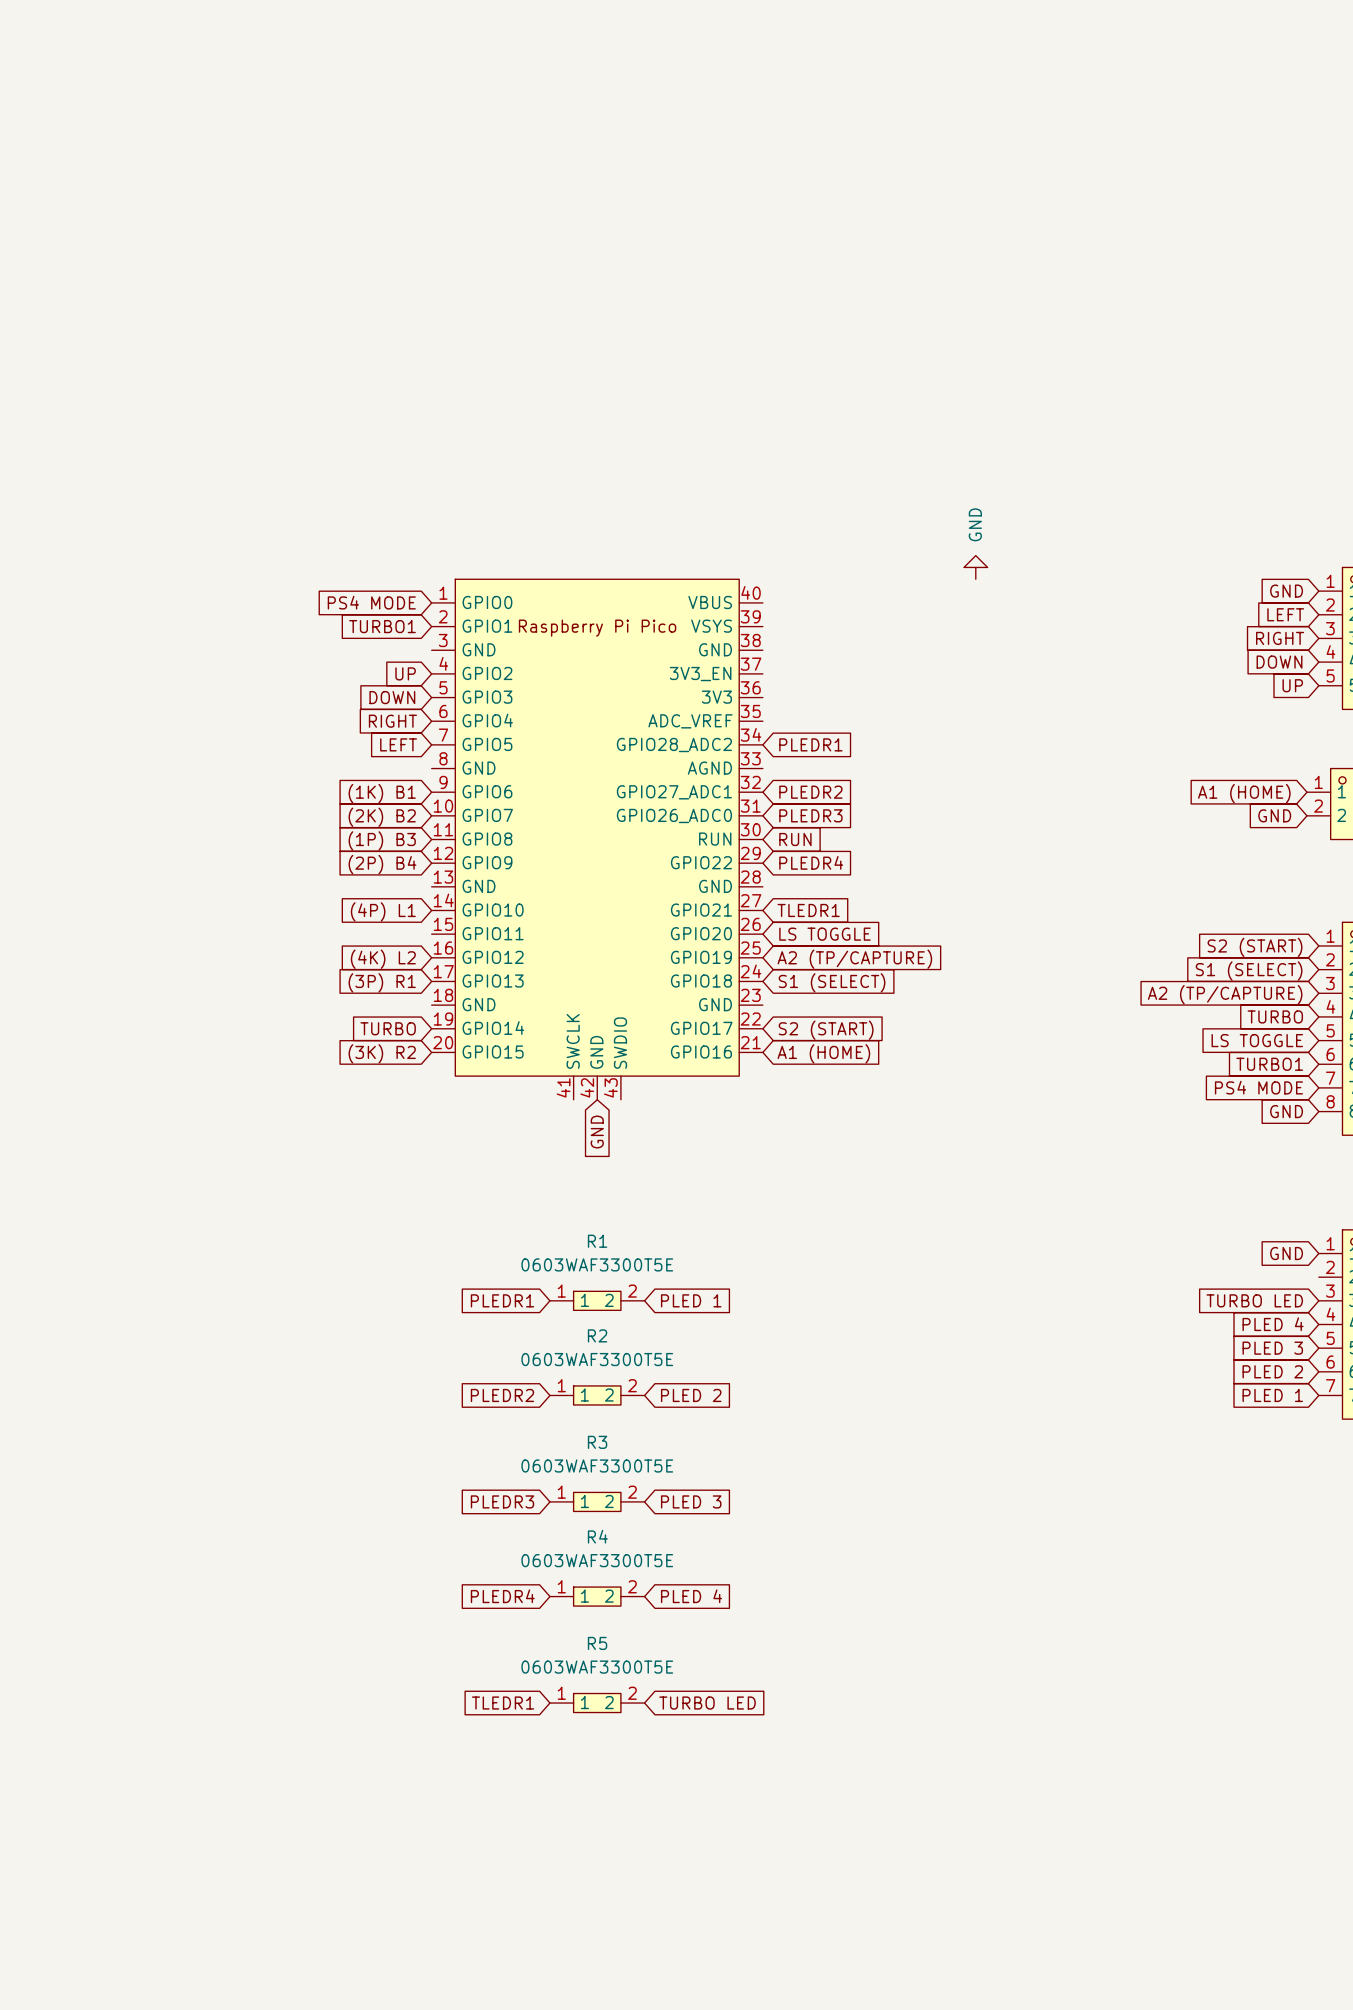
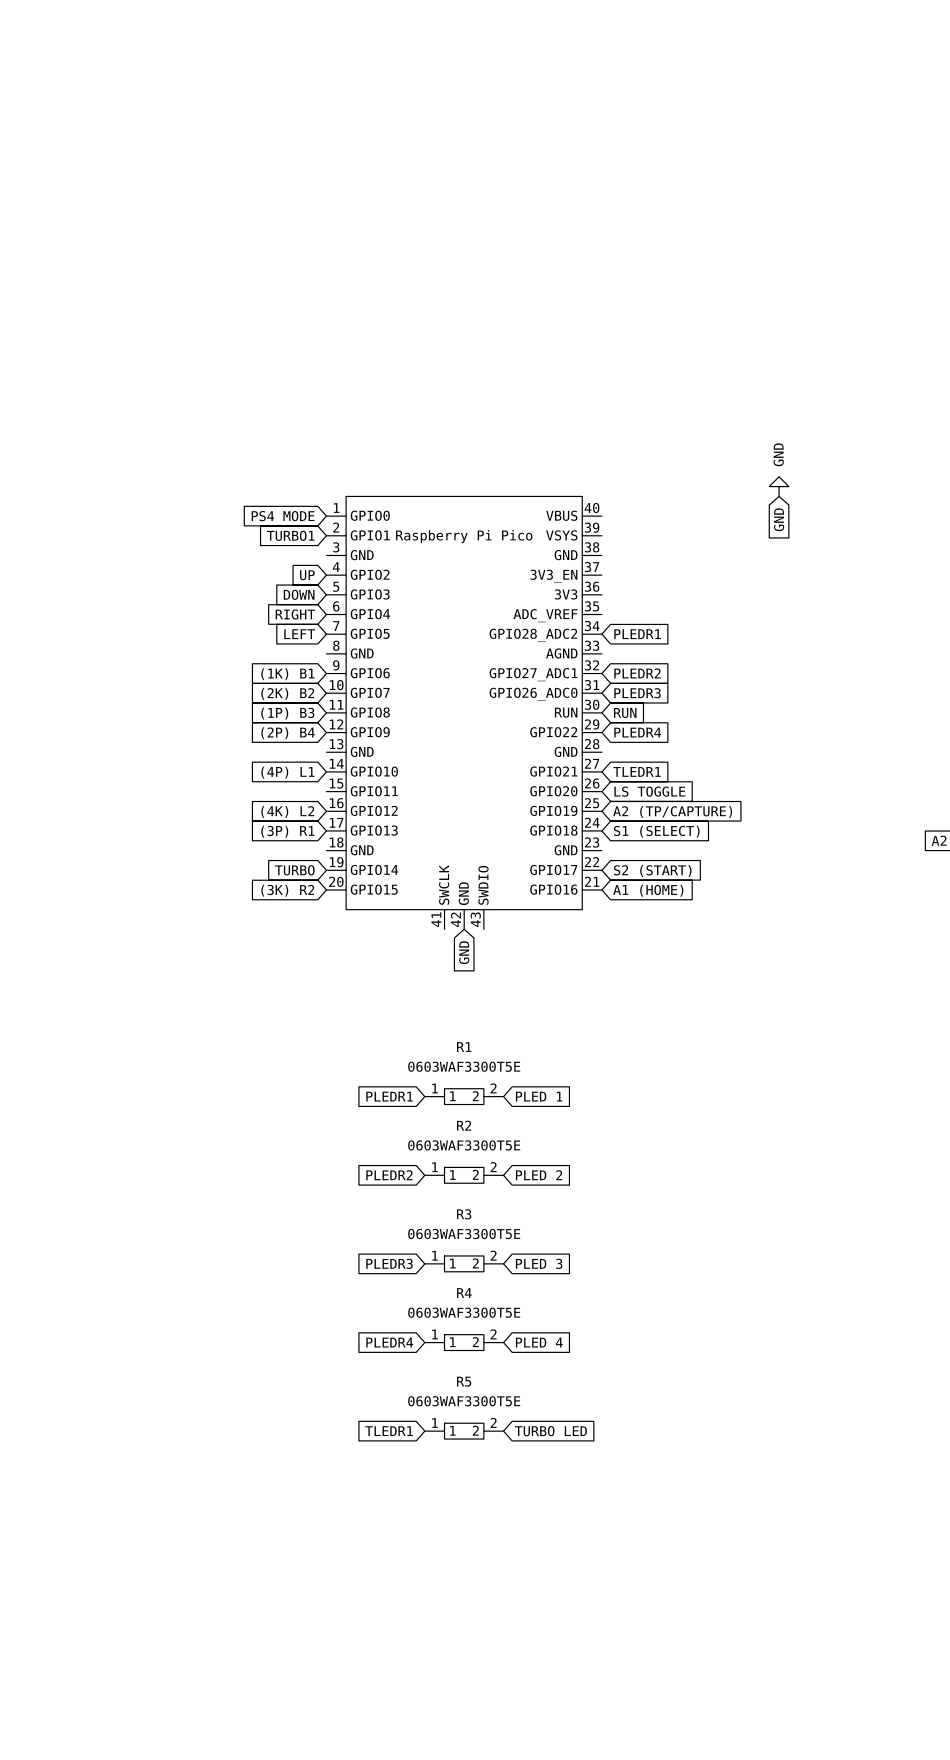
global label: none -> GND (779, 519)

